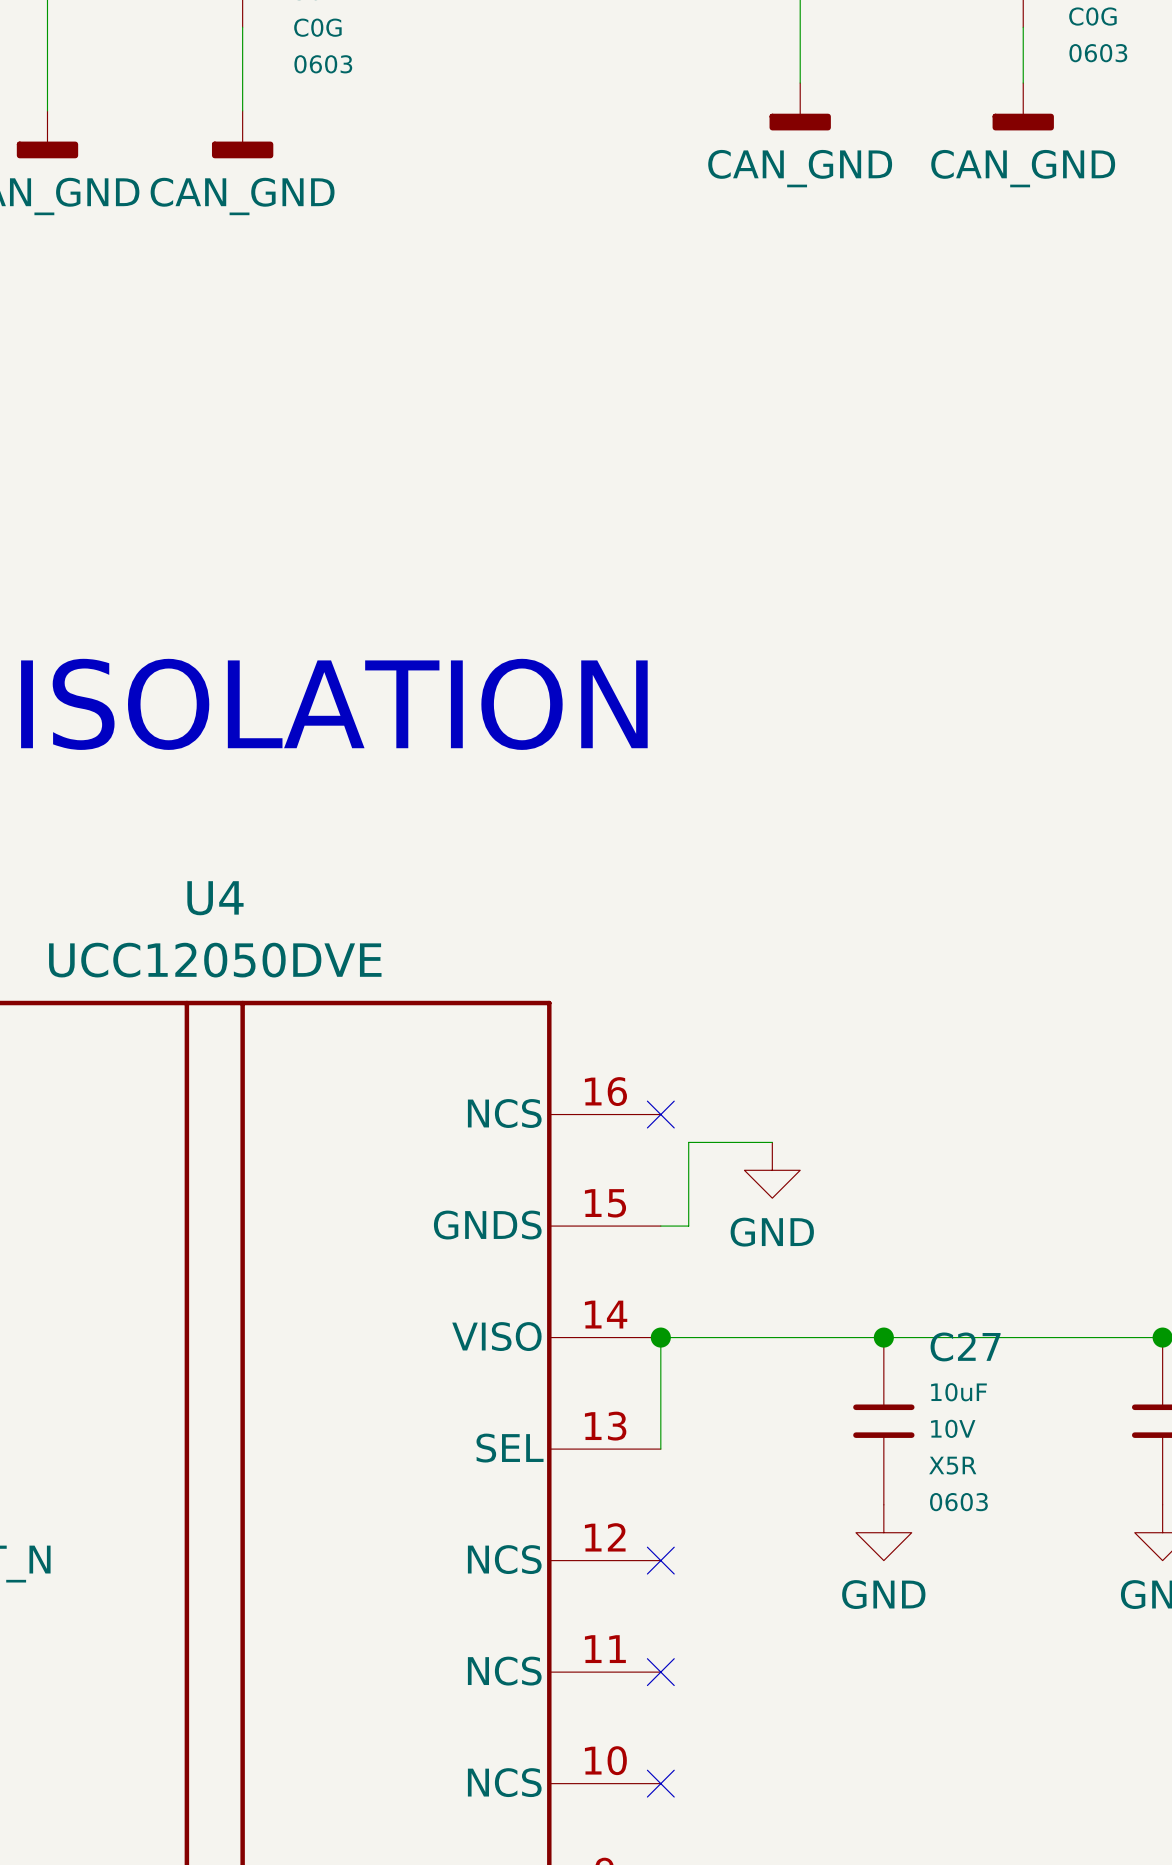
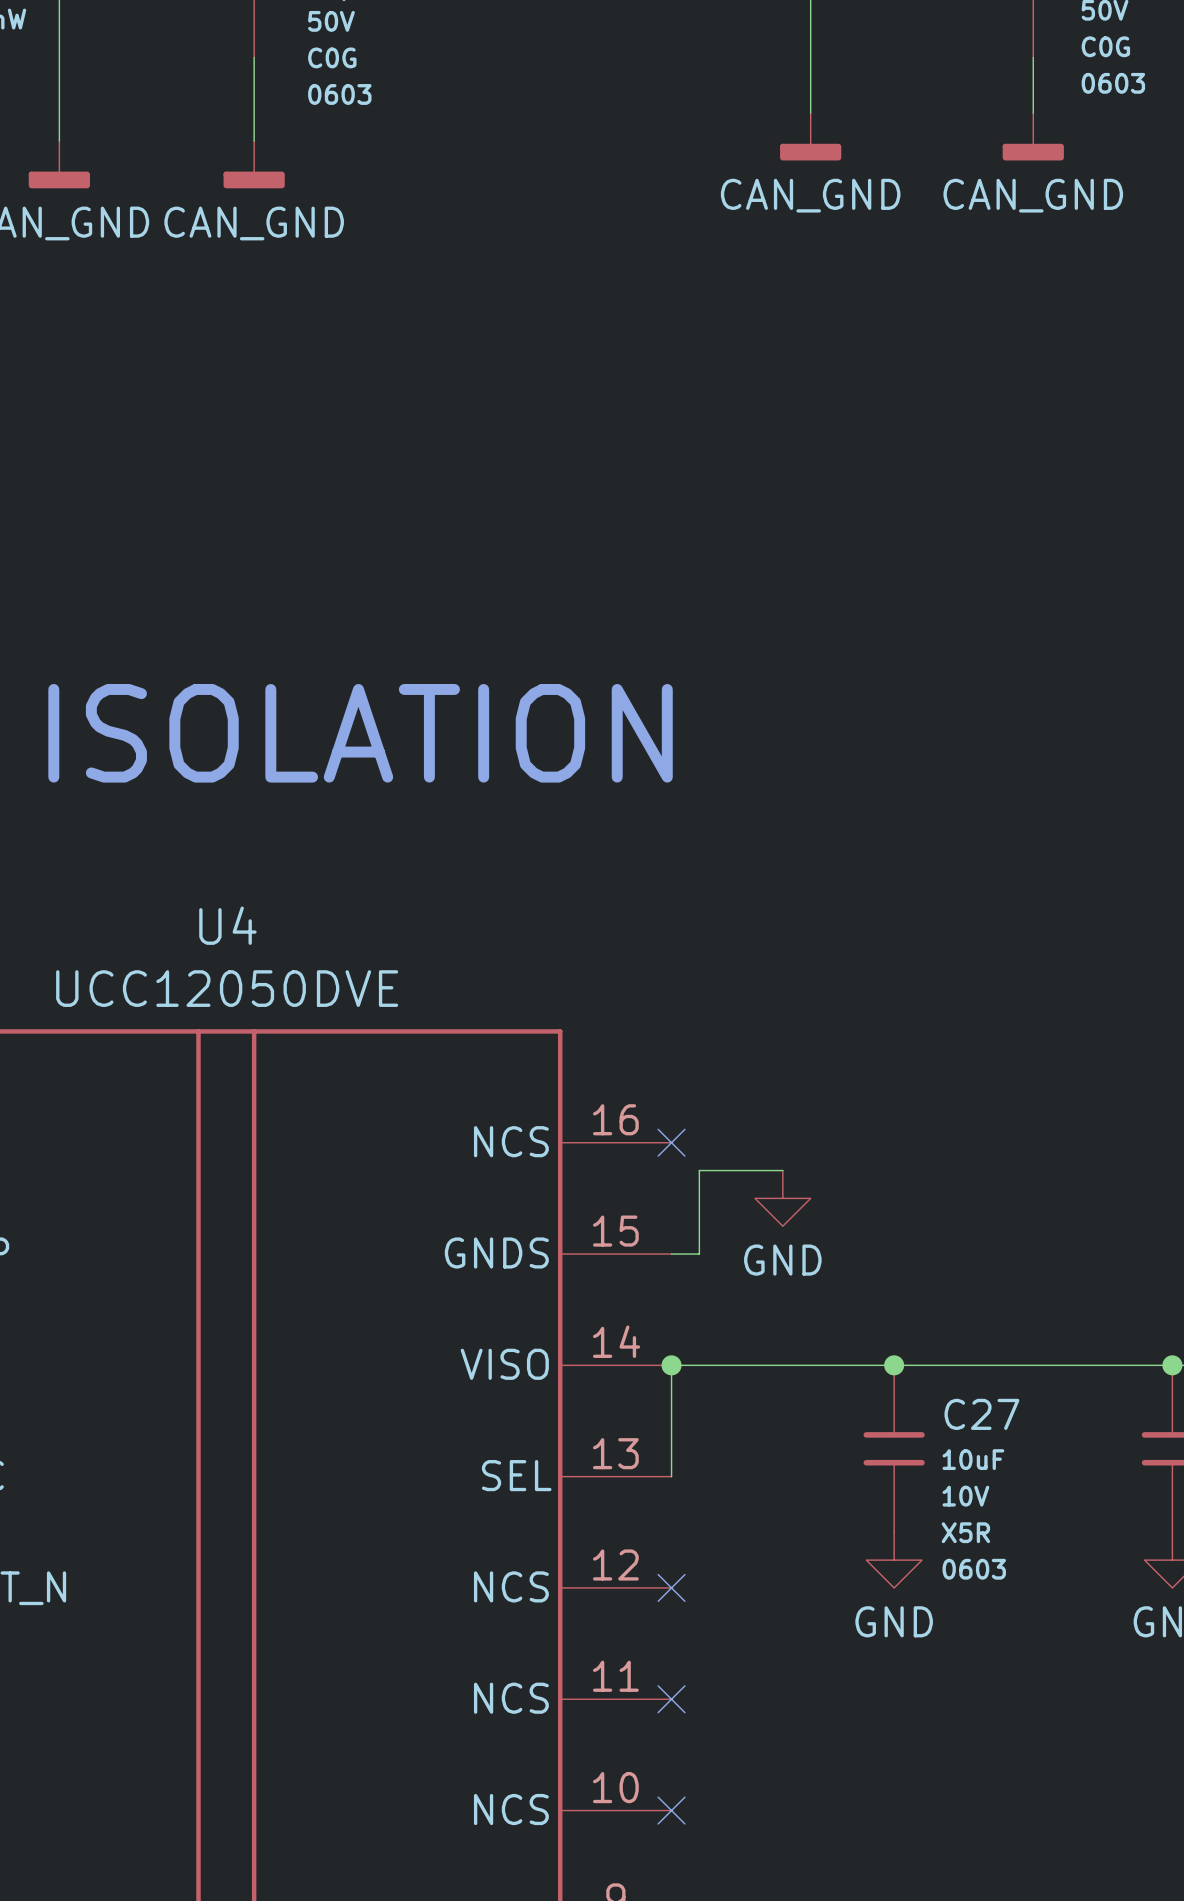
C27 name position: C27 (965, 1346) -> C27 (981, 1414)
C27 value position: 10uF (958, 1392) -> 10uF (973, 1459)
C27 text position: 10V (953, 1428) -> 10V (965, 1496)
C27 text position: X5R (952, 1465) -> X5R (965, 1532)
C27 text position: 0603 (958, 1502) -> 0603 (974, 1569)

